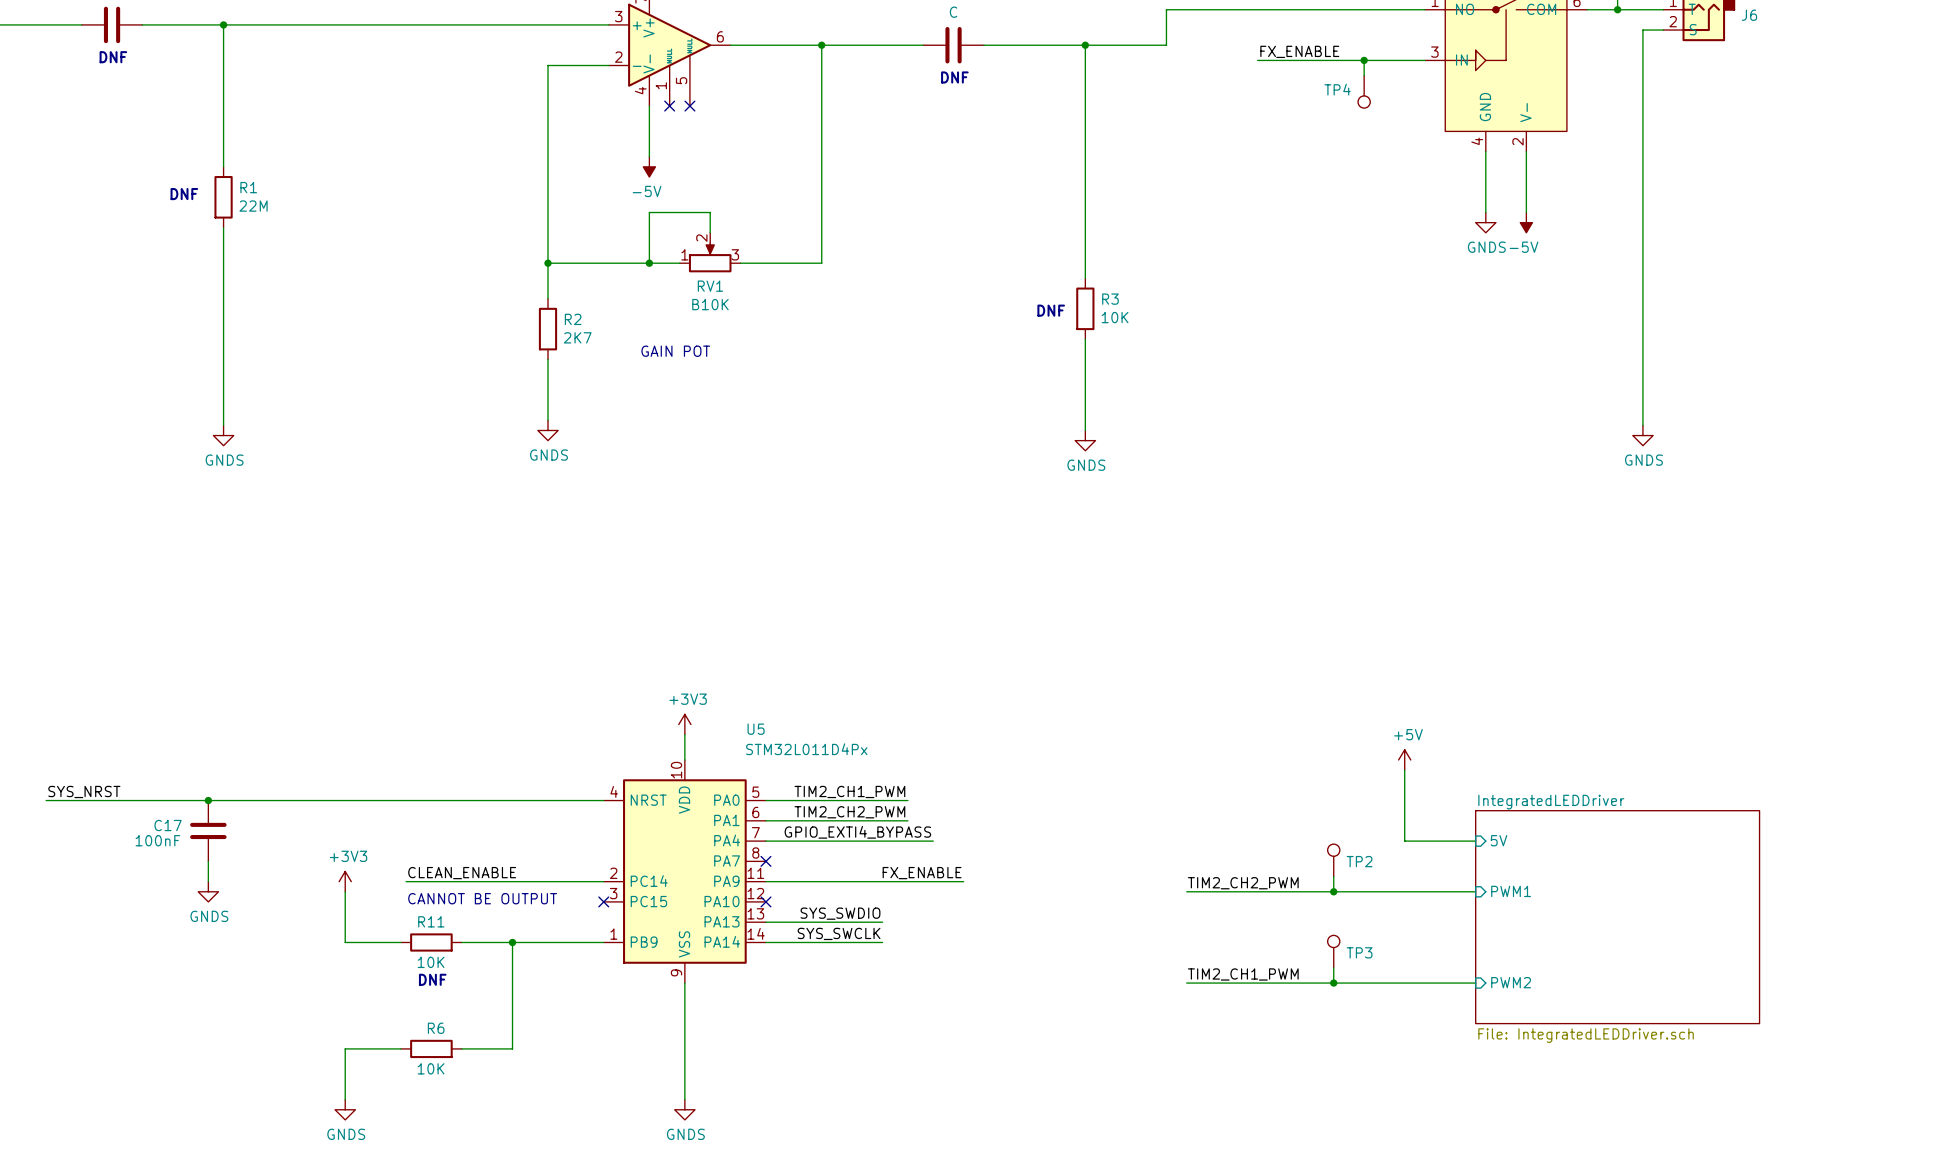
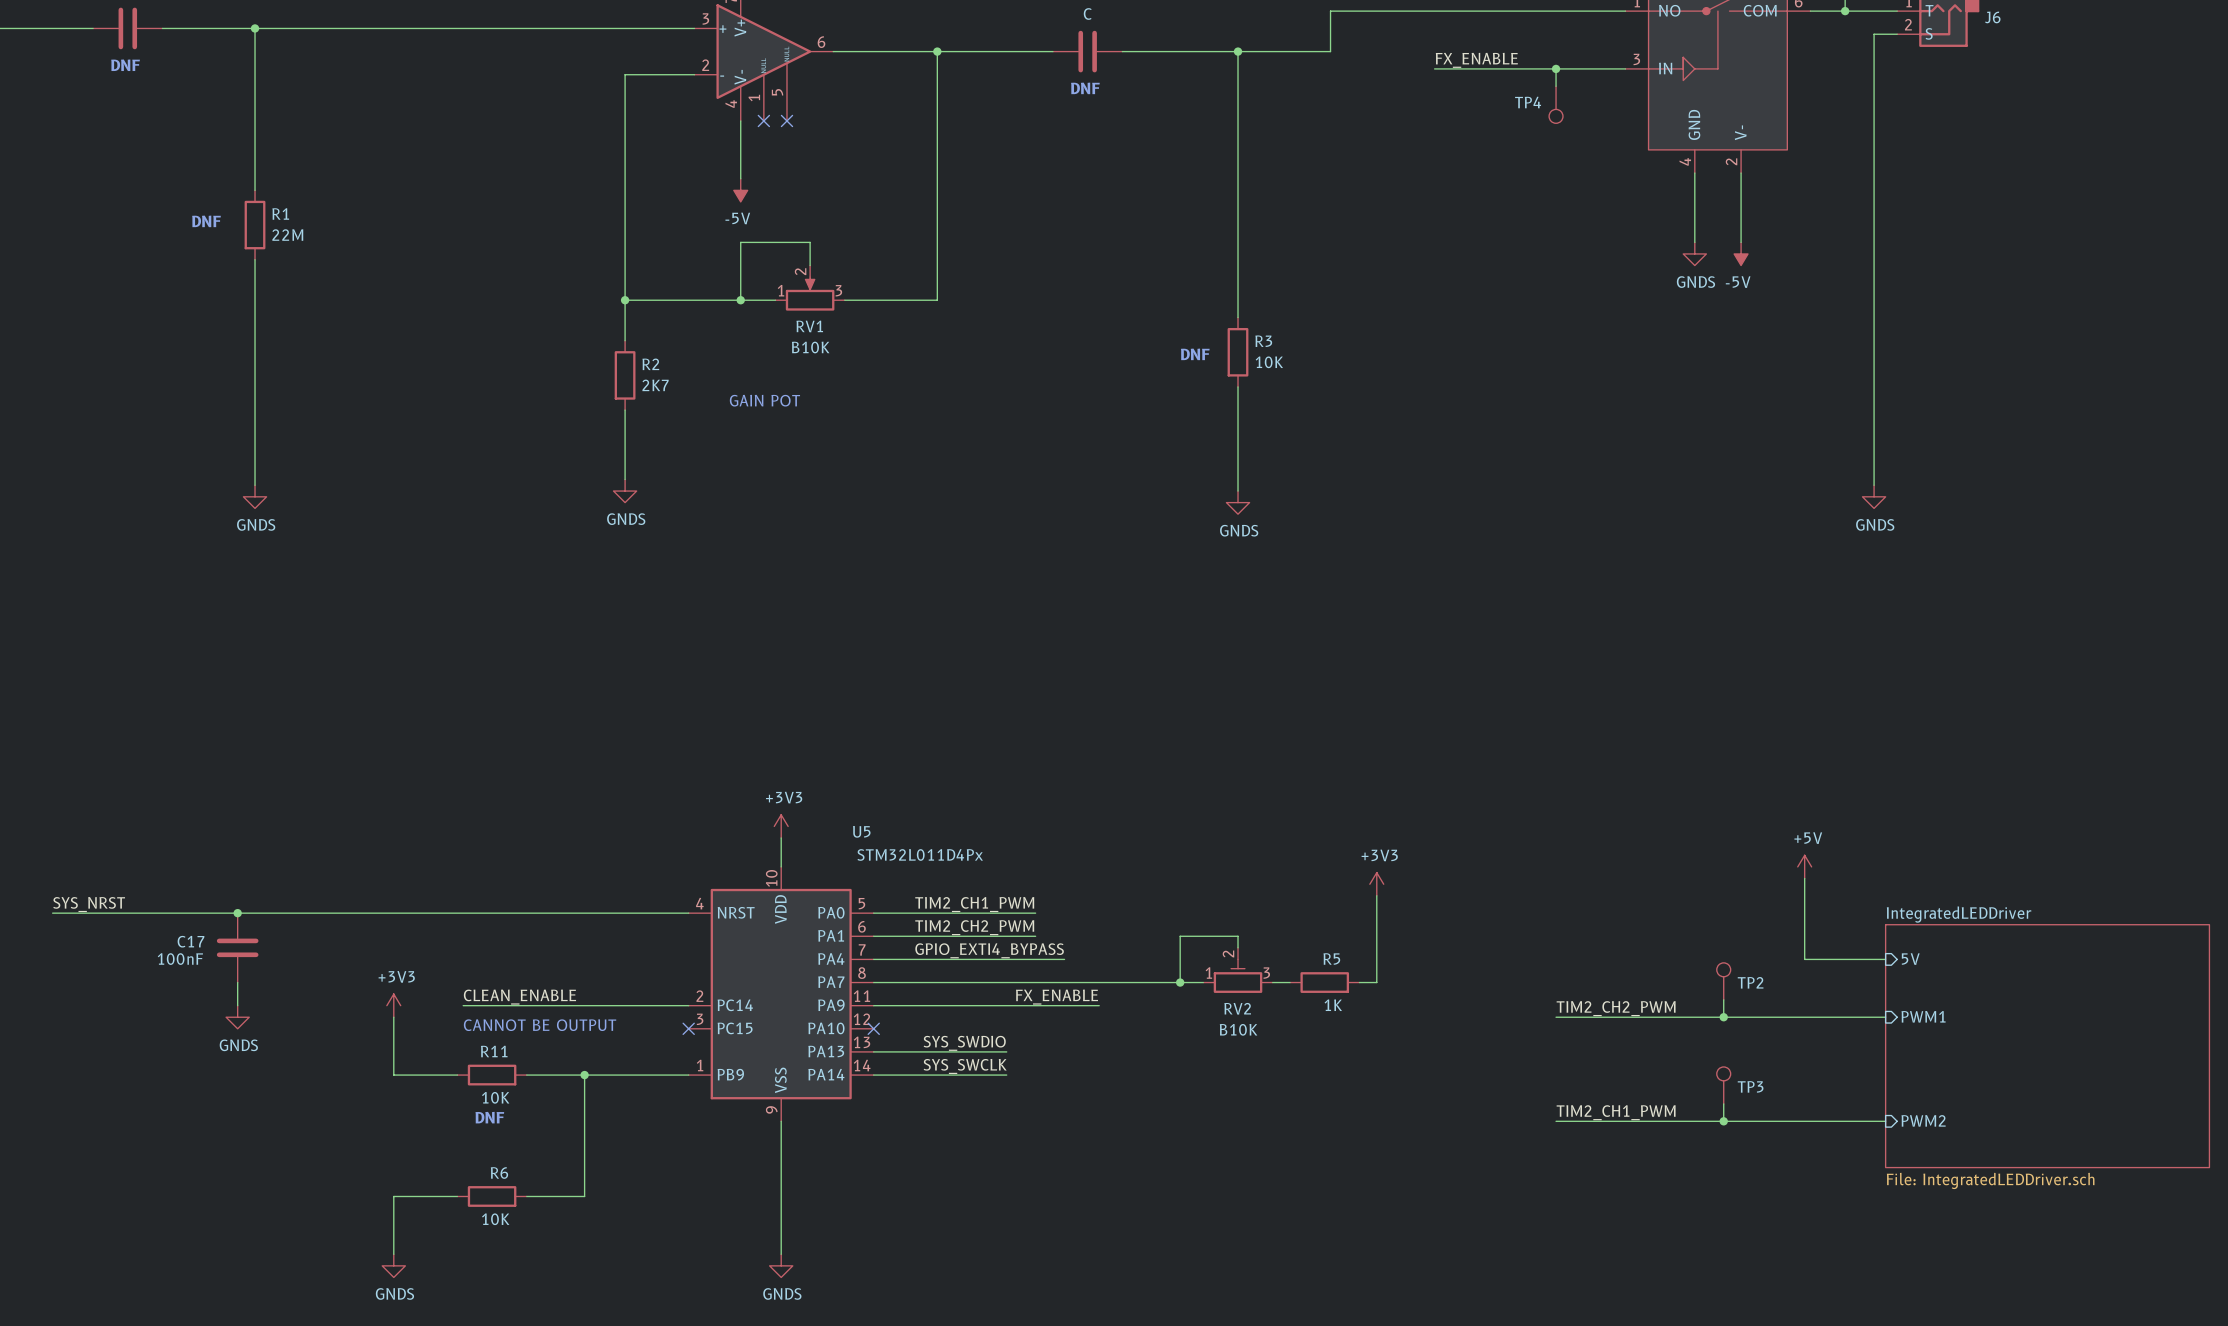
power symbol position: +5V (1404, 759) -> +5V (1804, 866)
wire: (1404, 770) (1404, 841) (1475, 841) -> (1804, 878) (1804, 959) (1885, 959)
power symbol: none -> +3V3 (1376, 884)
wire: none -> (1376, 895) (1376, 982) (1359, 982)
wire: none -> (1238, 947) (1238, 936) (1180, 936) (1180, 982)
sheet pin position: 5V (1499, 840) -> 5V (1910, 959)
RV2: none -> B10K (1238, 970)
TP2 position: (1333, 860) -> (1723, 981)
wire: none -> (873, 982) (1203, 982)
no-connect mark: (765, 861) -> none
junction: none -> (1180, 982)
wire: none -> (1272, 982) (1290, 982)
R5: none -> 1K (1324, 982)
wire: (1333, 876) (1333, 891) -> (1723, 999) (1723, 1017)
label position: TIM2_CH2_PWM (1243, 883) -> TIM2_CH2_PWM (1616, 1008)
wire: (1186, 891) (1364, 891) -> none
junction: (1333, 891) -> none
wire: none -> (1683, 1017) (1885, 1017)
sheet pin position: PWM1 (1511, 891) -> PWM1 (1923, 1016)
junction: none -> (1723, 1017)
sheet IntegratedLEDDriver position: (1617, 917) -> (2047, 1046)
TP3 position: (1333, 951) -> (1723, 1085)
wire: (1333, 967) (1333, 983) -> (1723, 1103) (1723, 1121)
label position: TIM2_CH1_PWM (1243, 974) -> TIM2_CH1_PWM (1616, 1112)
sheet pin position: PWM2 (1511, 982) -> PWM2 (1923, 1120)
wire: (1186, 983) (1364, 983) -> none
junction: (1333, 983) -> none
wire: none -> (1683, 1121) (1885, 1121)
junction: none -> (1723, 1121)

